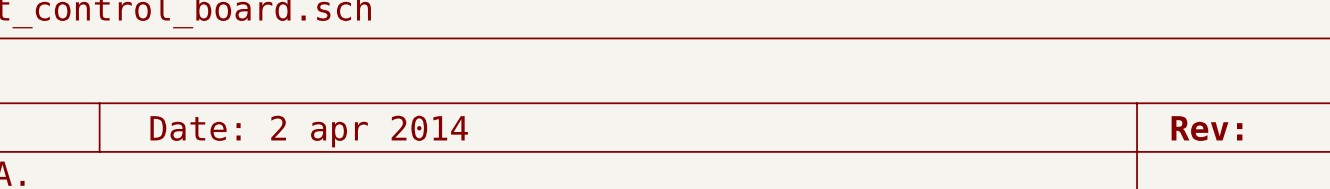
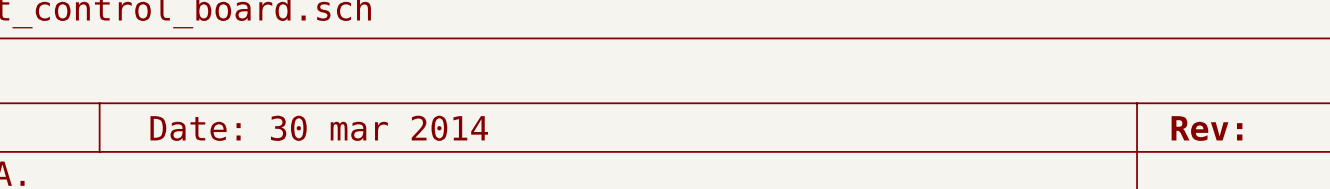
title block: Date: 2 apr 2014 (309, 131) -> Date: 30 mar 2014 (319, 128)

